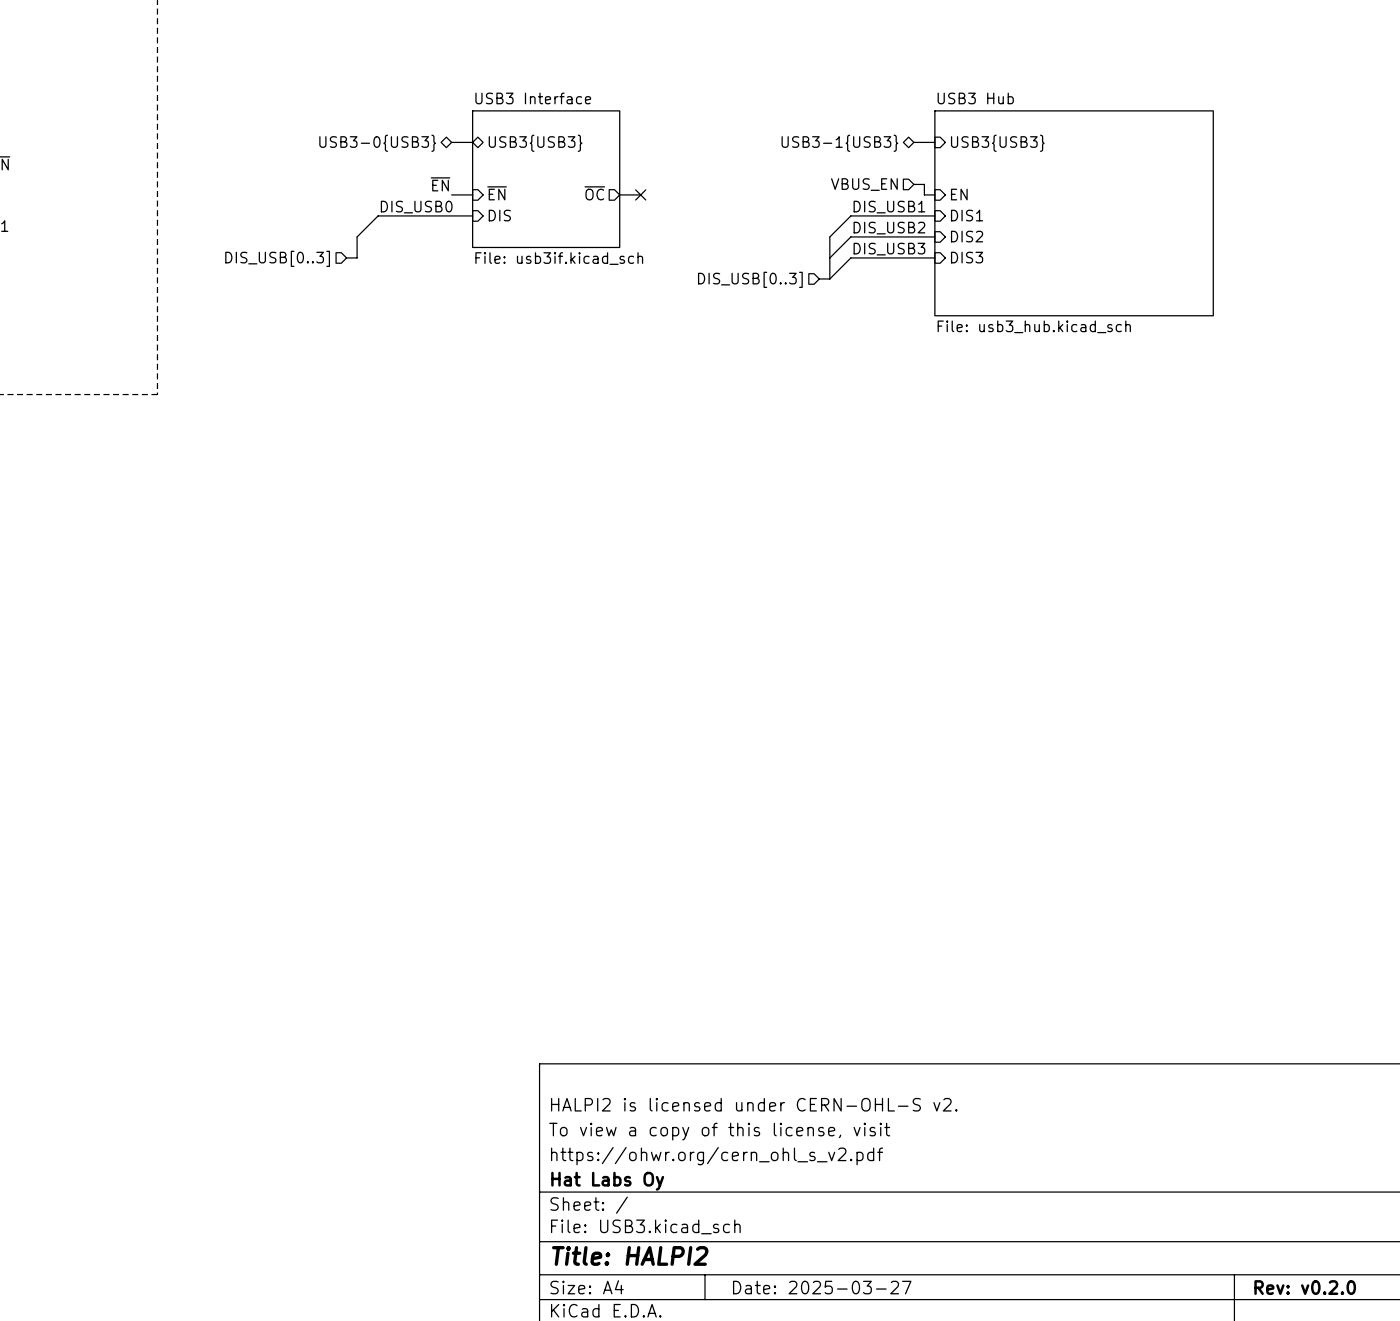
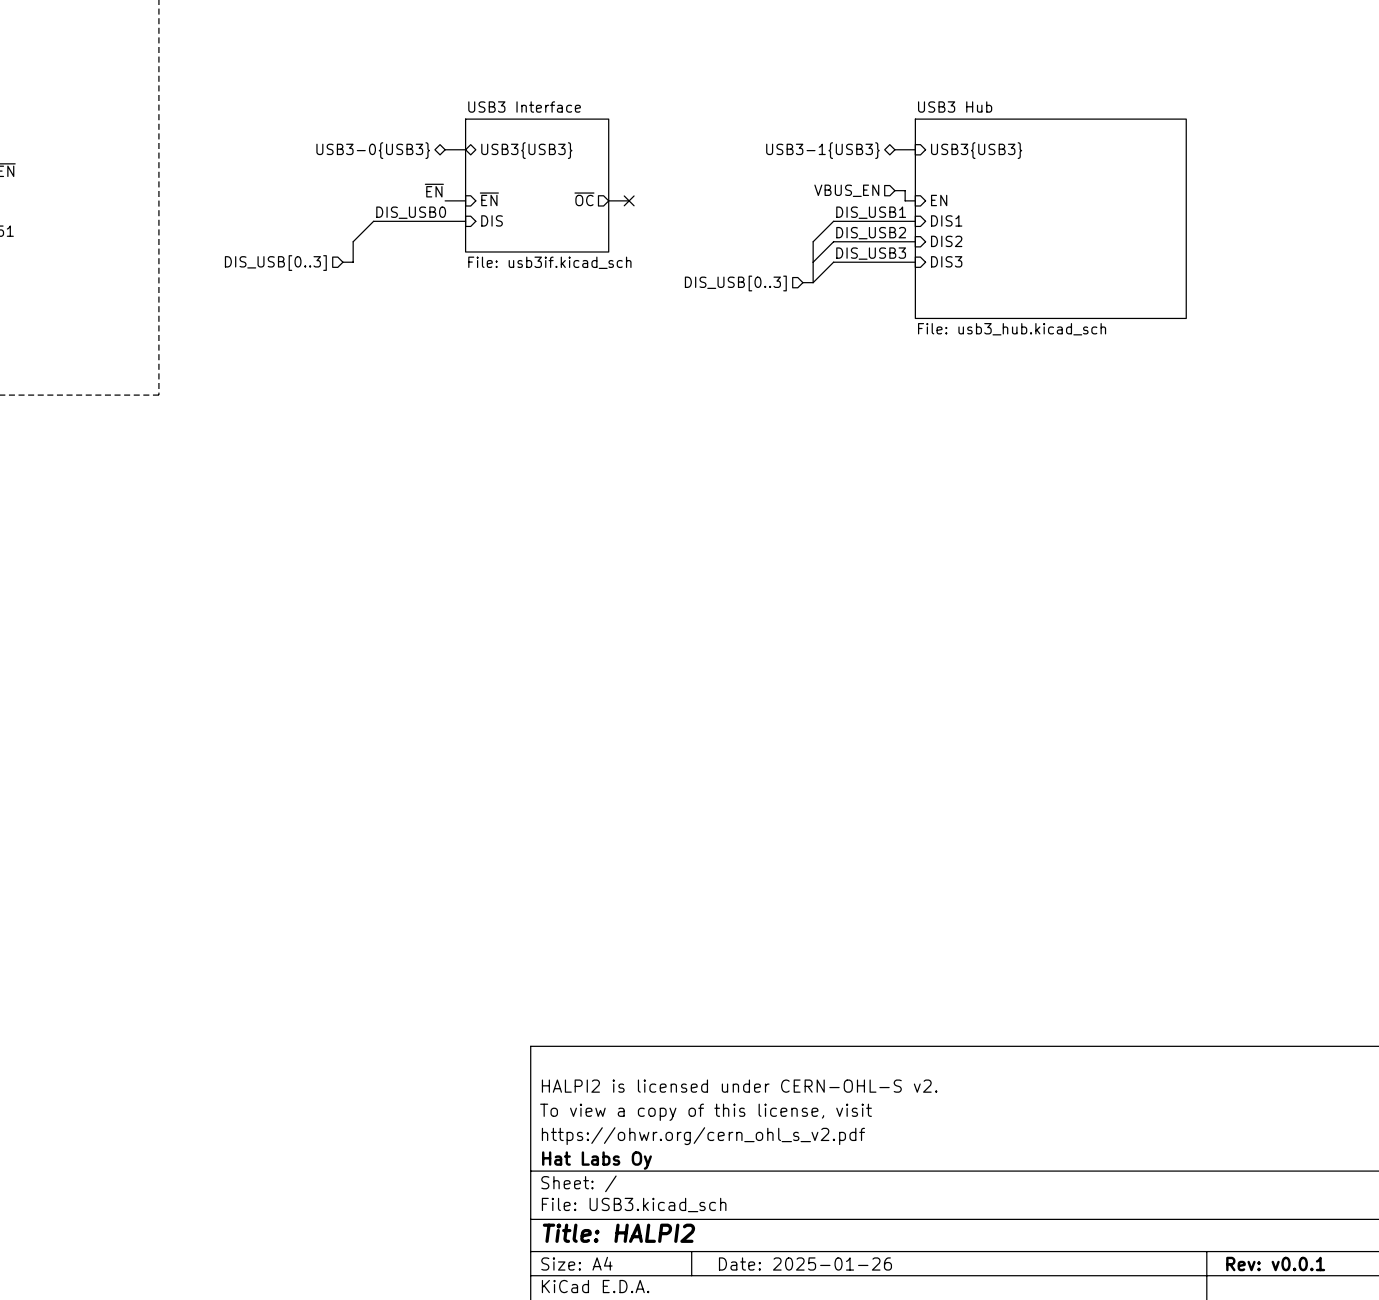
title block: Date: 2025-03-27 (822, 1287) -> Date: 2025-01-26 (805, 1263)
title block: Rev: v0.2.0 (1305, 1287) -> Rev: v0.0.1 (1275, 1263)

